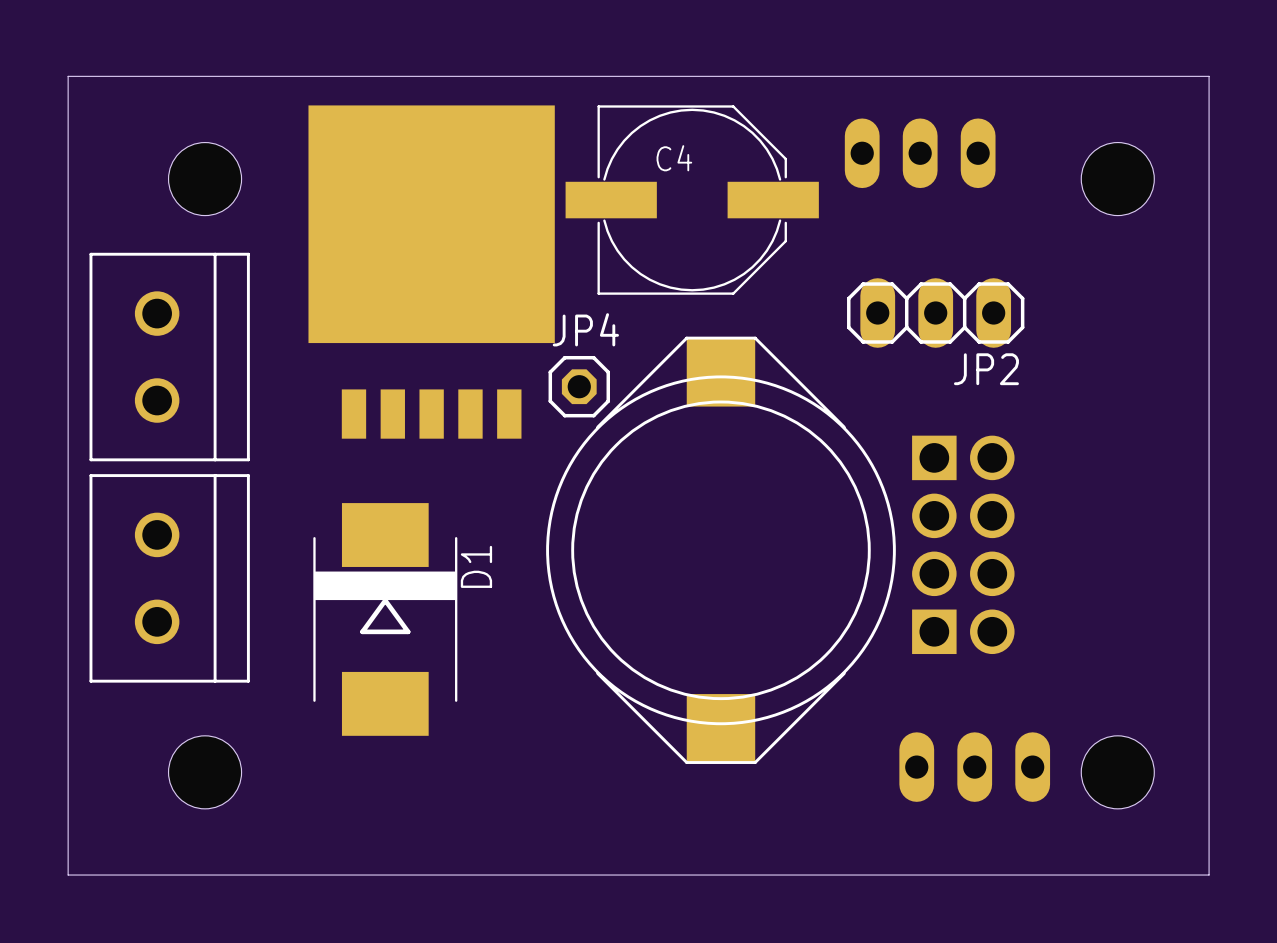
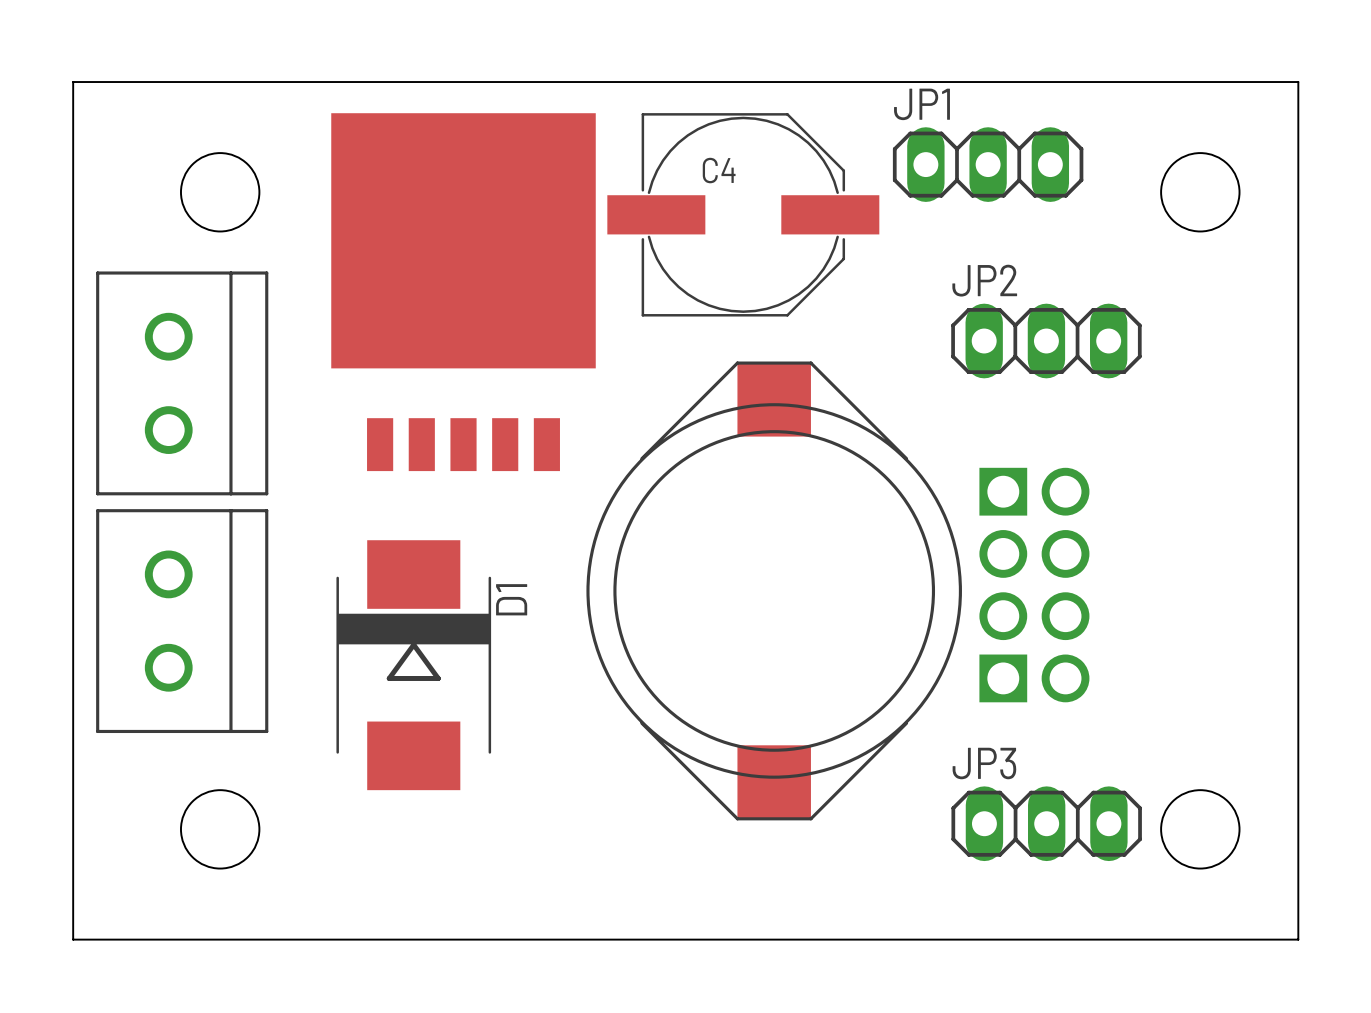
JP1 side: bottom (920, 153) -> top (988, 164)
JP2 position: (935, 313) -> (1046, 341)
JP2 name position: JP2 (986, 369) -> JP2 (984, 280)
JP4: (579, 386) -> none
JP3 side: bottom (974, 767) -> top (1046, 823)

